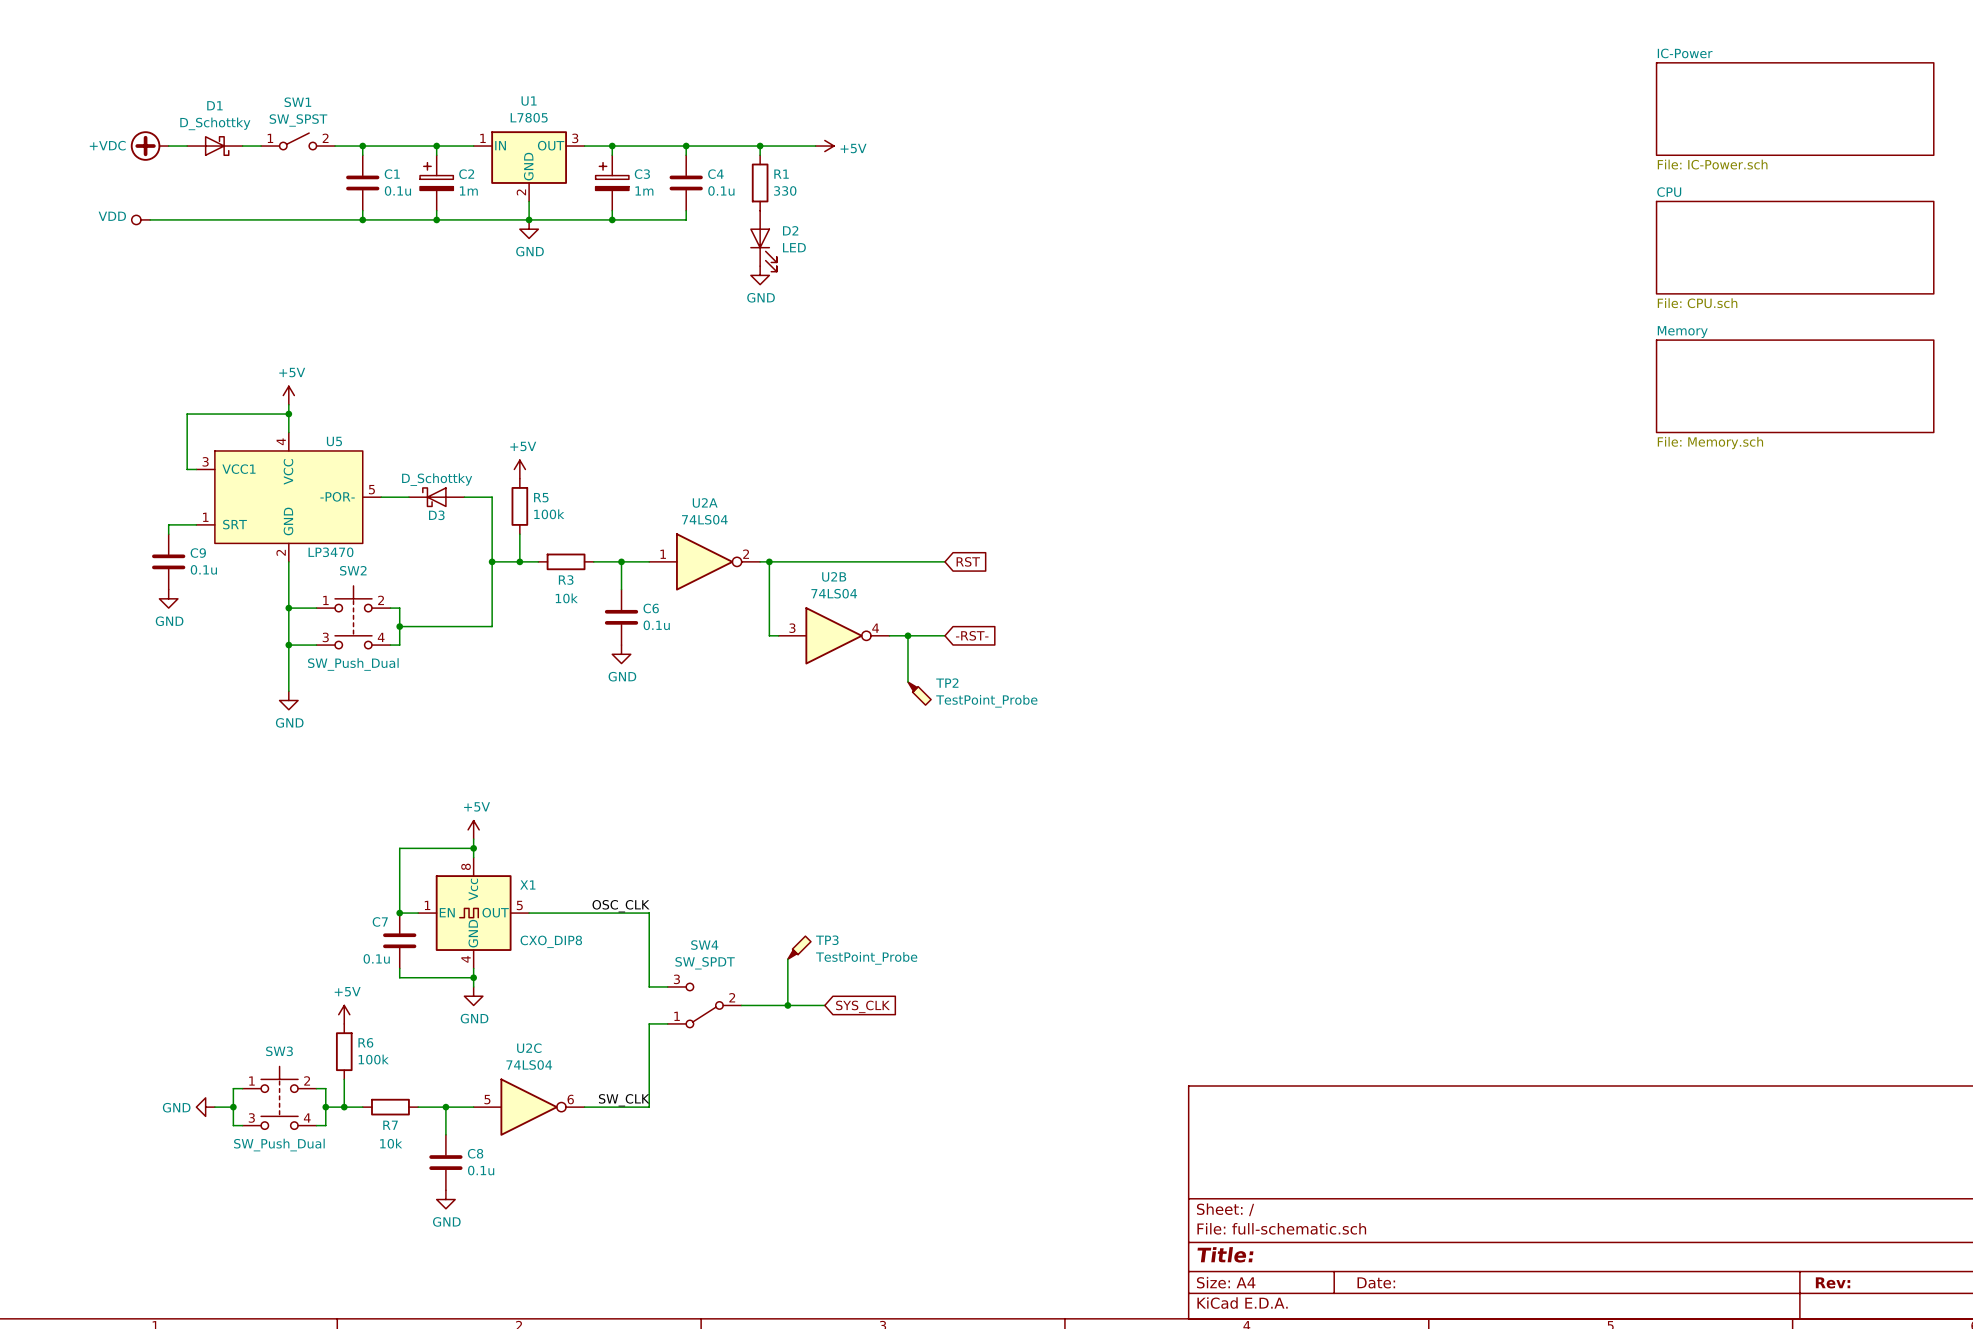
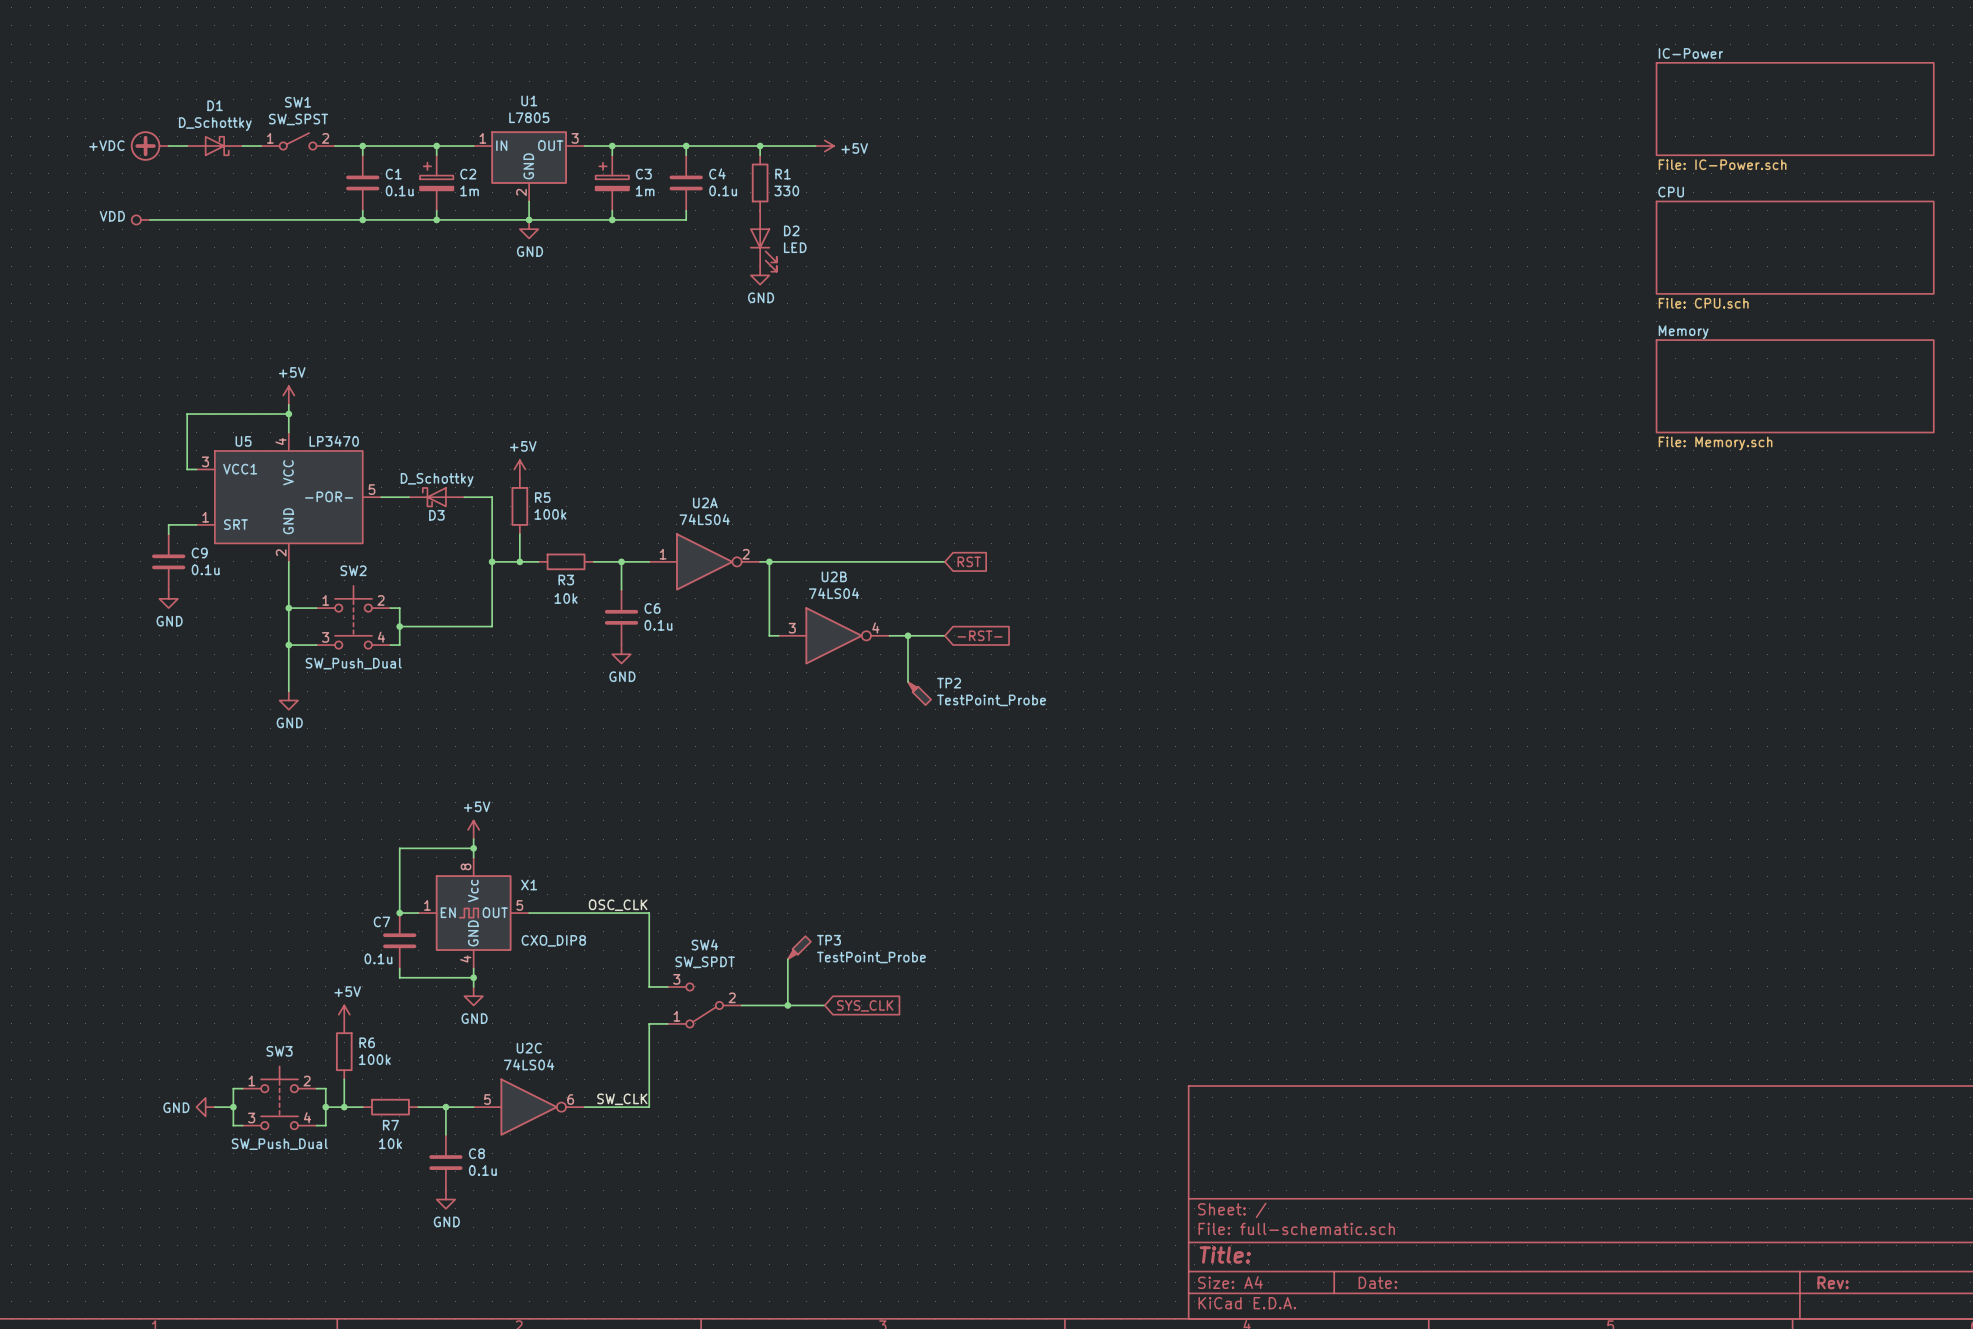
U5 name position: U5 (334, 441) -> U5 (243, 441)
U5 value position: LP3470 (330, 552) -> LP3470 (334, 441)

